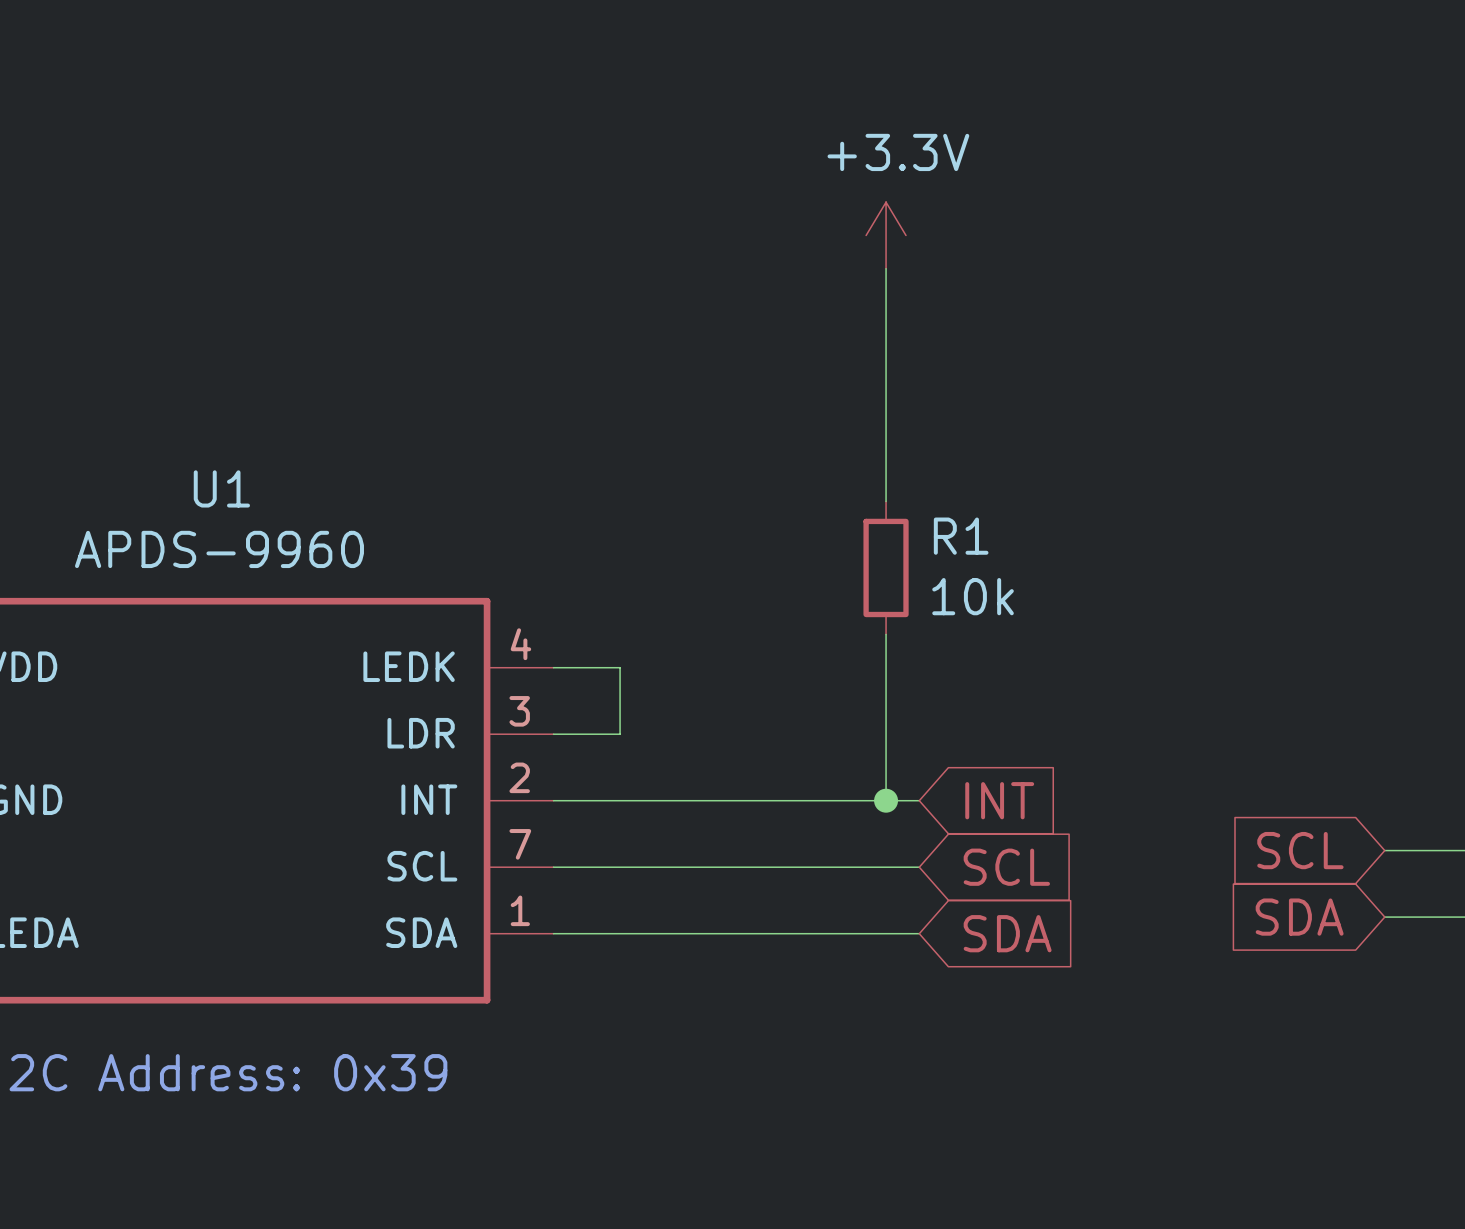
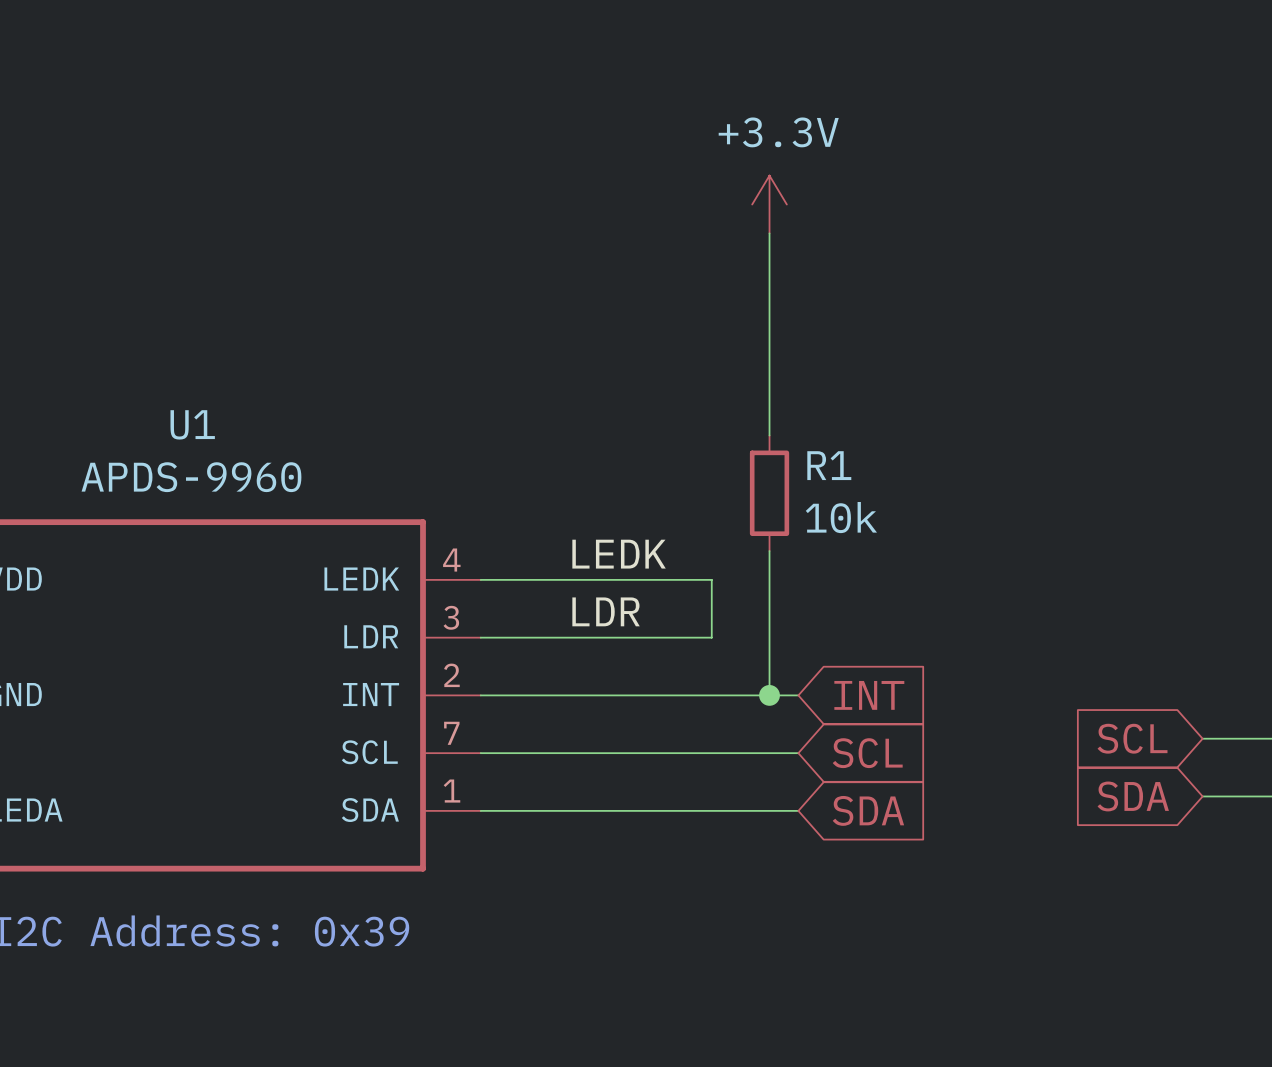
label: none -> LEDK (619, 554)
wire: (620, 667) (620, 734) -> (538, 579) (711, 579) (711, 637) (538, 637)
label: none -> LDR (606, 611)

